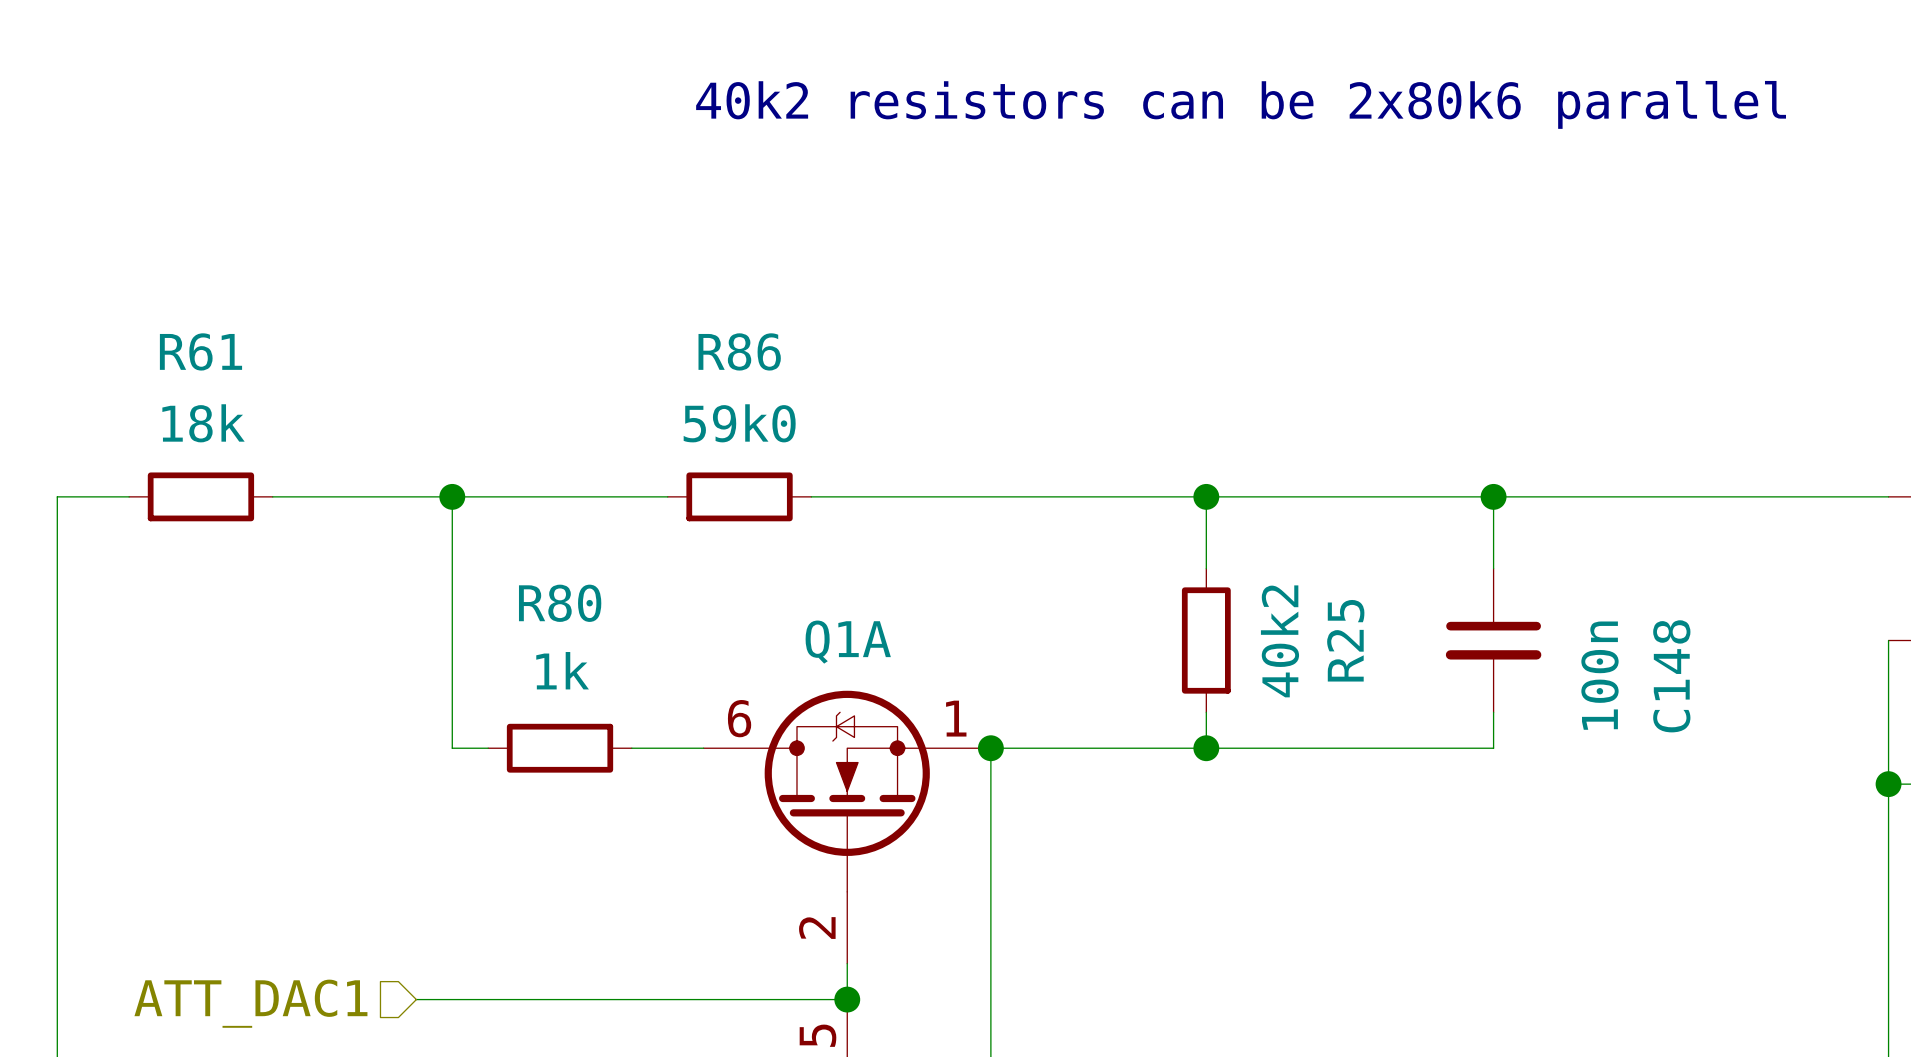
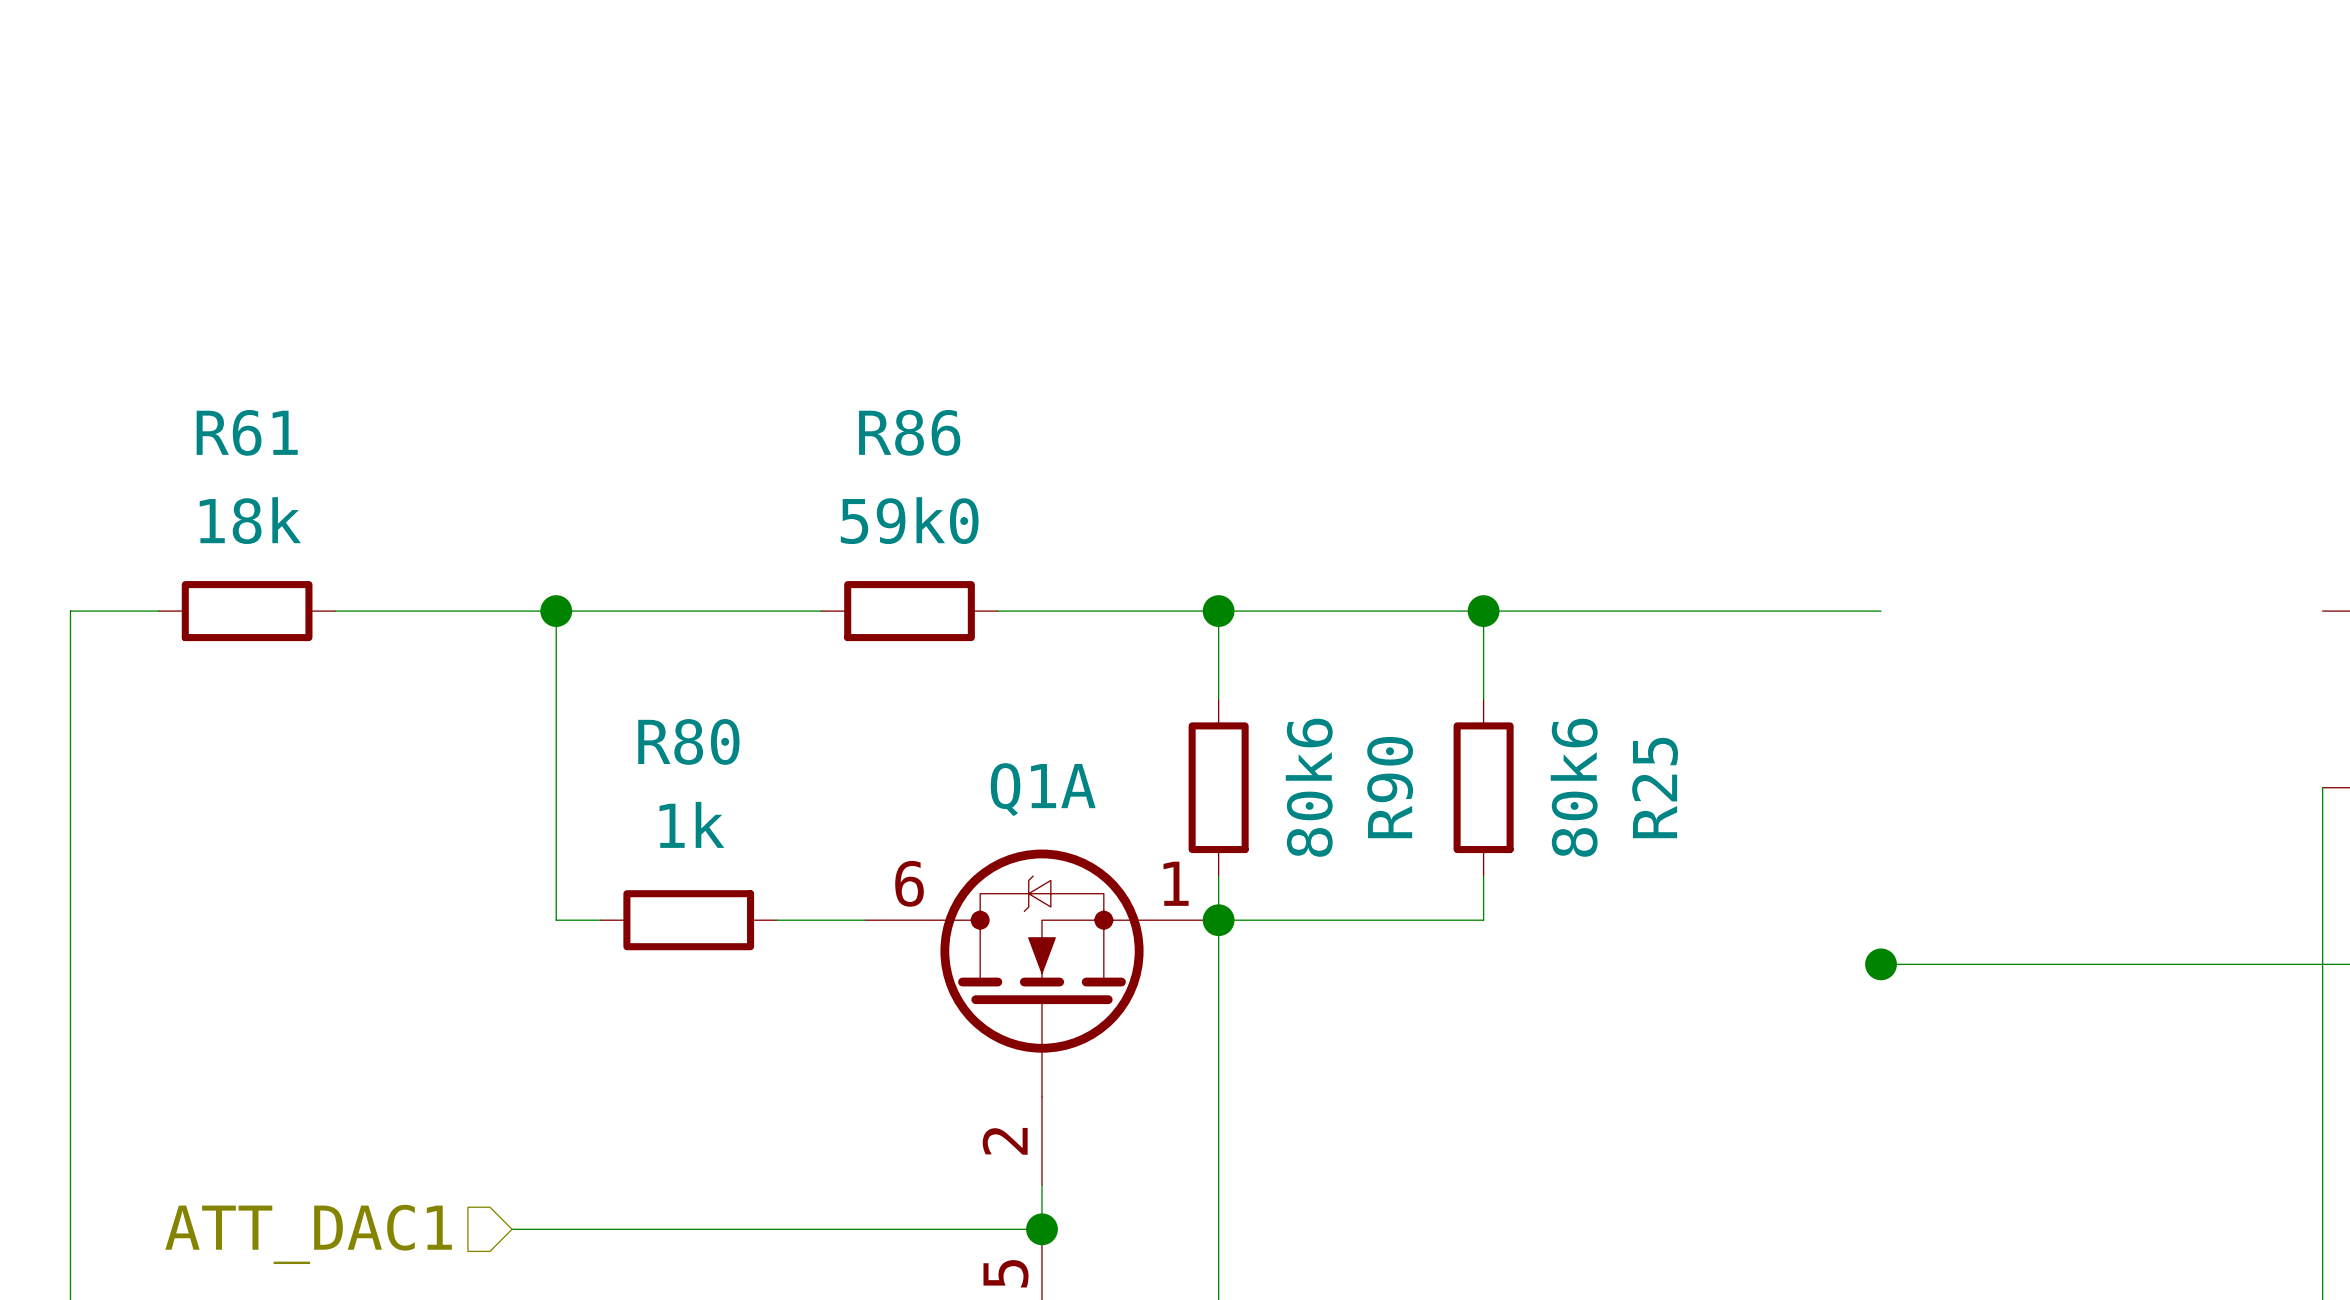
text: 40k2 resistors can be 2x80k6 parallel (1241, 104) -> none
junction: none -> (1218, 611)
wire: (1493, 496) (1493, 568) -> (1218, 611) (1218, 699)
junction: (1493, 496) -> none
wire: (1529, 496) (1888, 496) -> (1881, 964) (2322, 964)
R90: none -> 80k6 (1218, 787)
C148: 100n (1493, 640) -> none
R25 value: 40k2 (1279, 641) -> 80k6 (1574, 787)
wire: none -> (1218, 876) (1218, 920)
wire: (1493, 712) (1493, 748) (1206, 748) -> none
junction: (1206, 748) -> none
junction: none -> (1881, 964)
junction: (1888, 784) -> none

